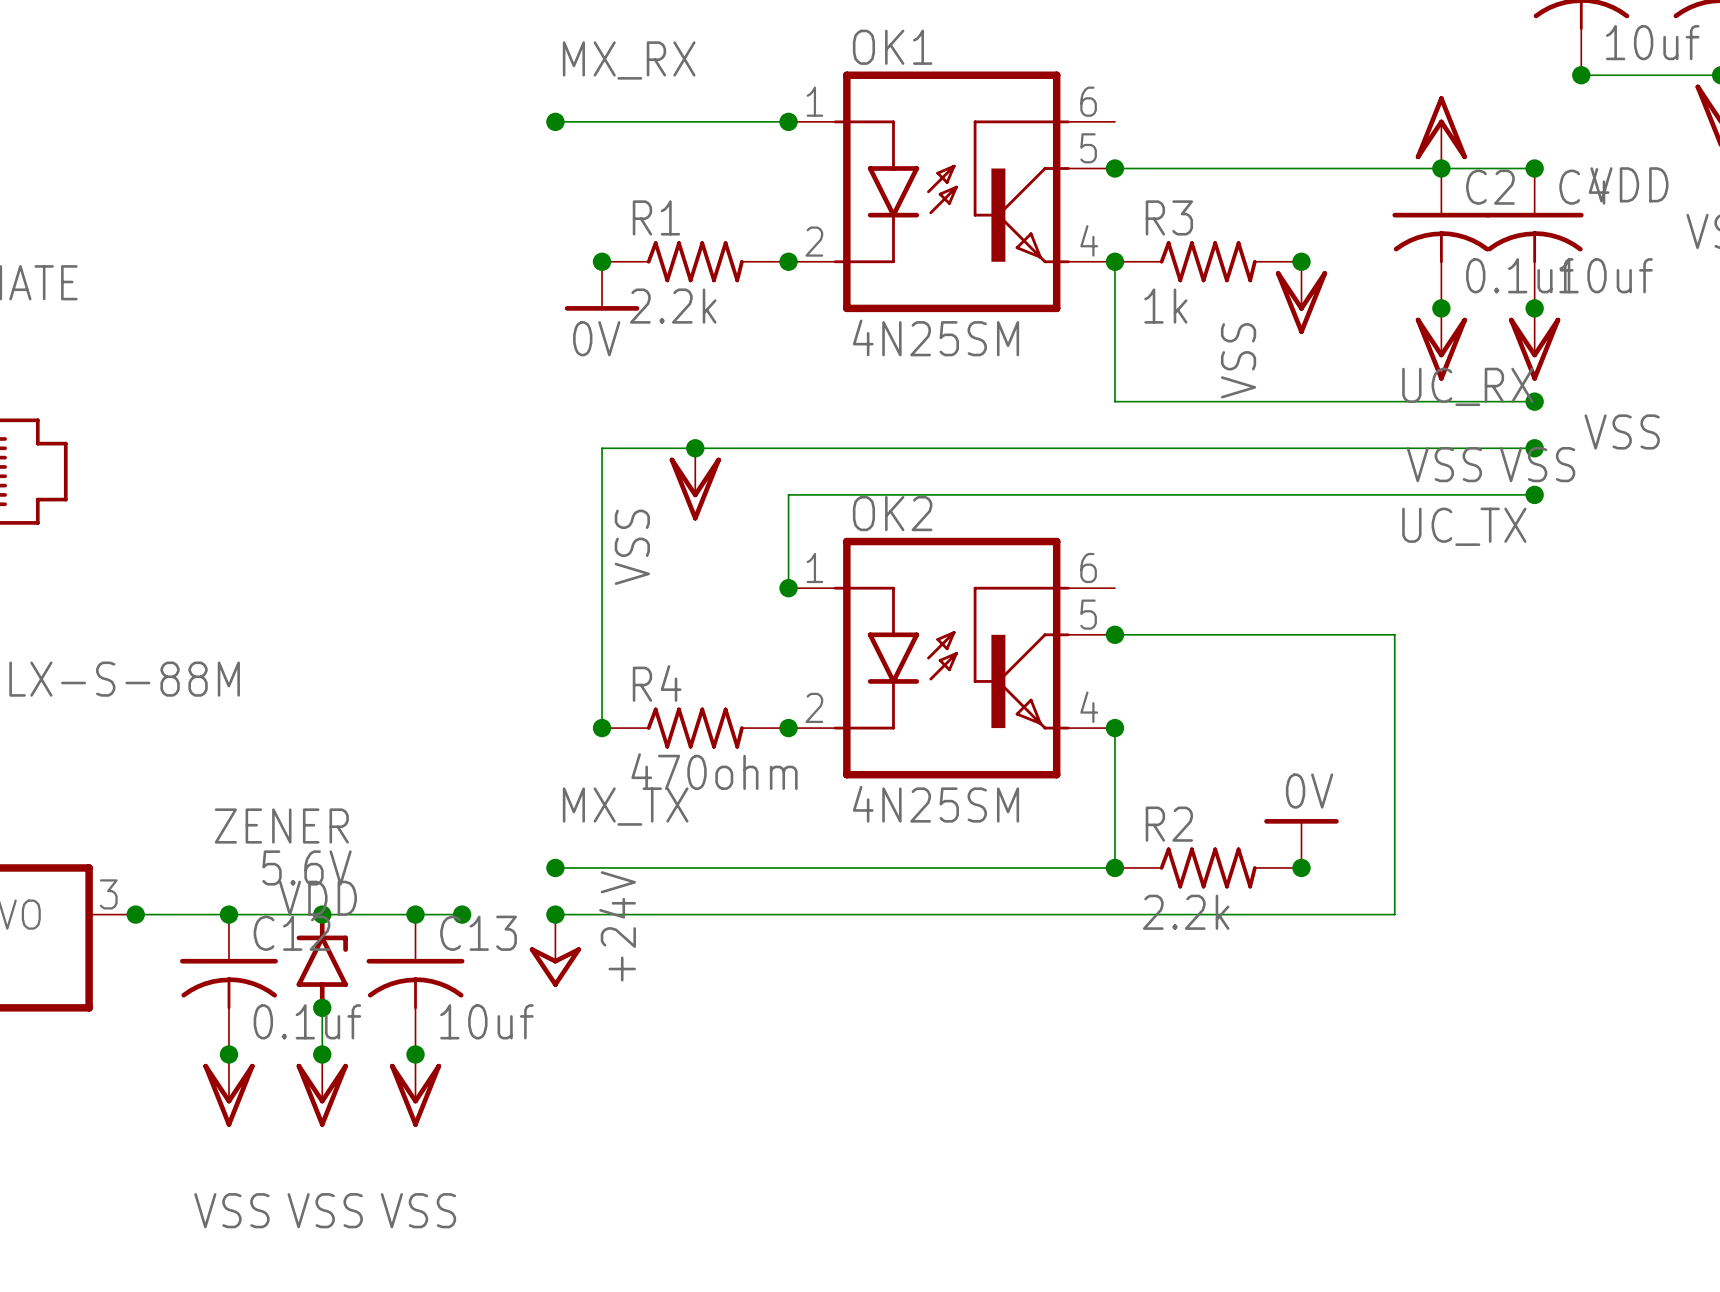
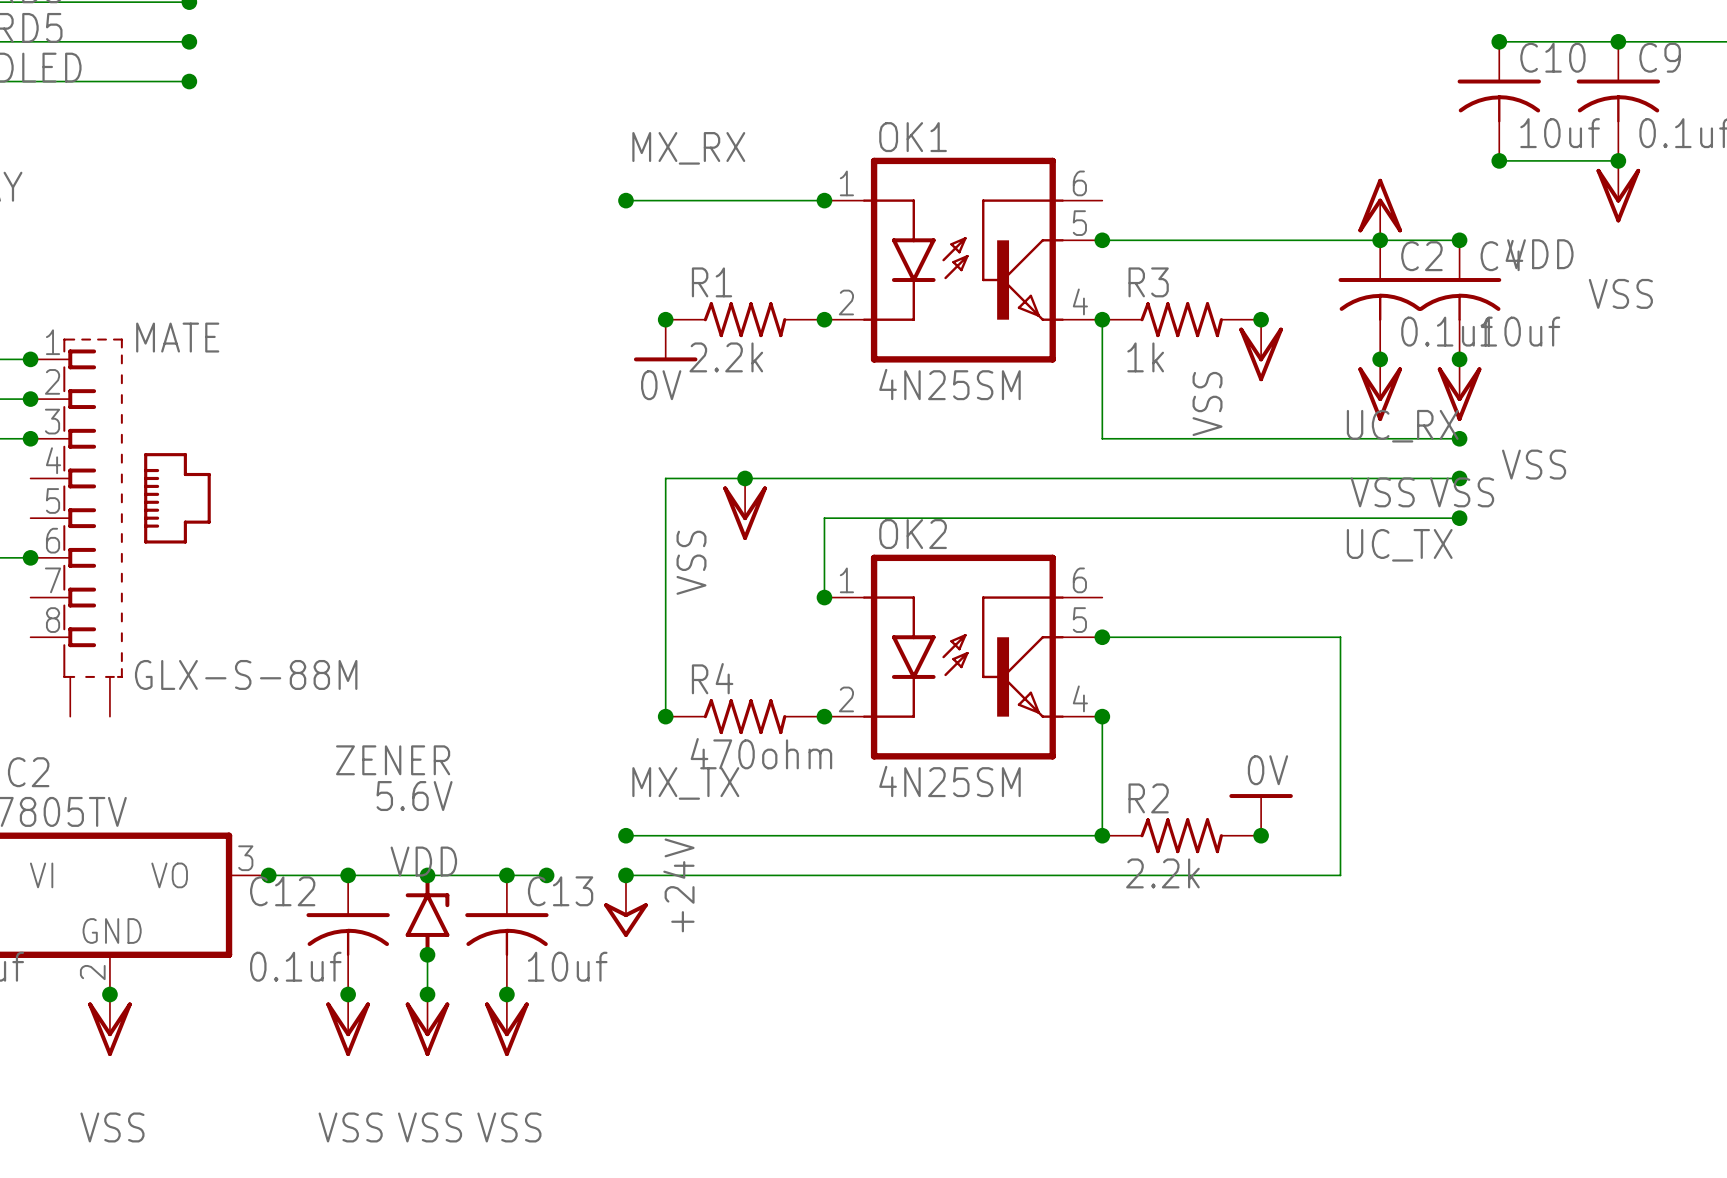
ZENER name position: ZENER (281, 826) -> ZENER (393, 760)
ZENER value position: 5.6V (307, 867) -> 5.6V (414, 796)
C12 name position: C12 (292, 933) -> C12 (282, 891)
C12 value position: 0.1uf (307, 1021) -> 0.1uf (295, 966)

